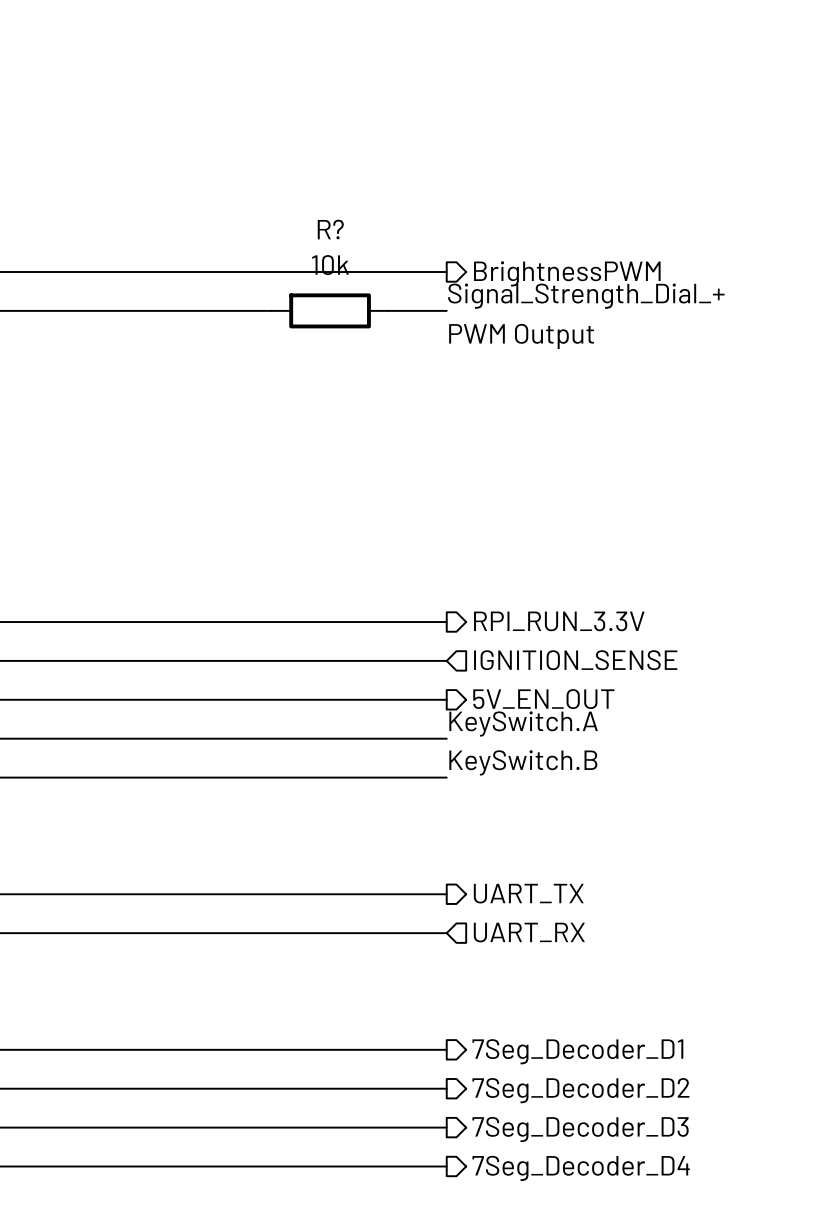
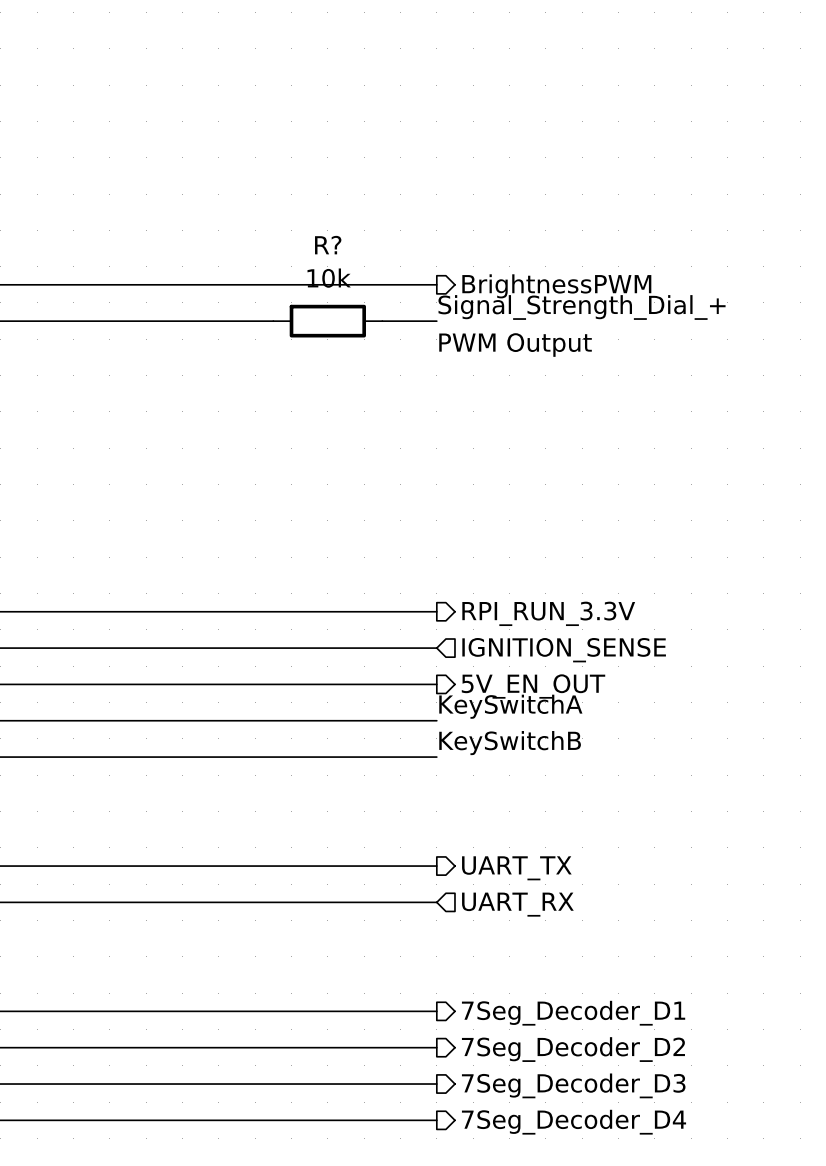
label: KeySwitch.A (523, 723) -> KeySwitchA (510, 706)
label: KeySwitch.B (523, 762) -> KeySwitchB (510, 743)

